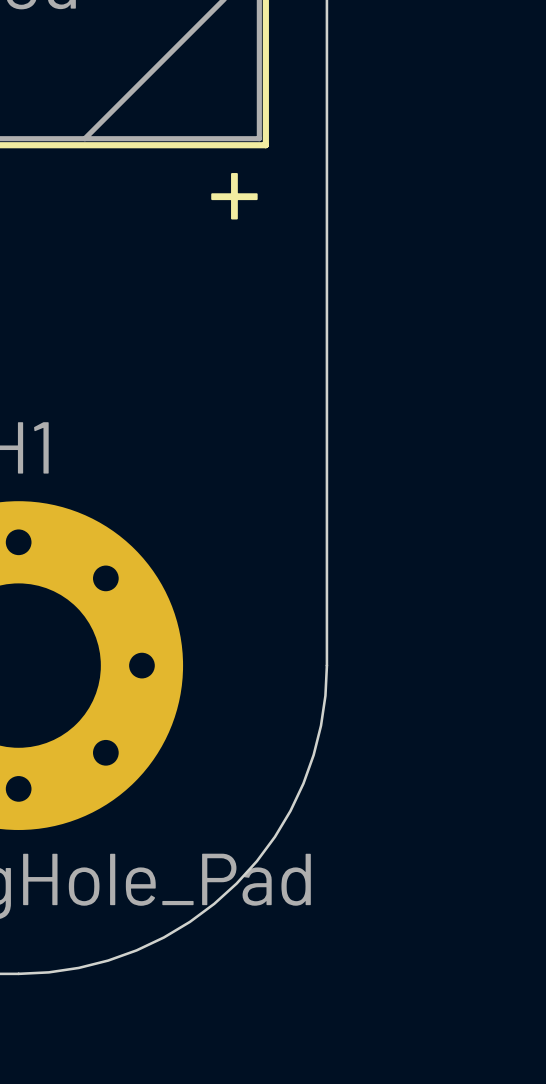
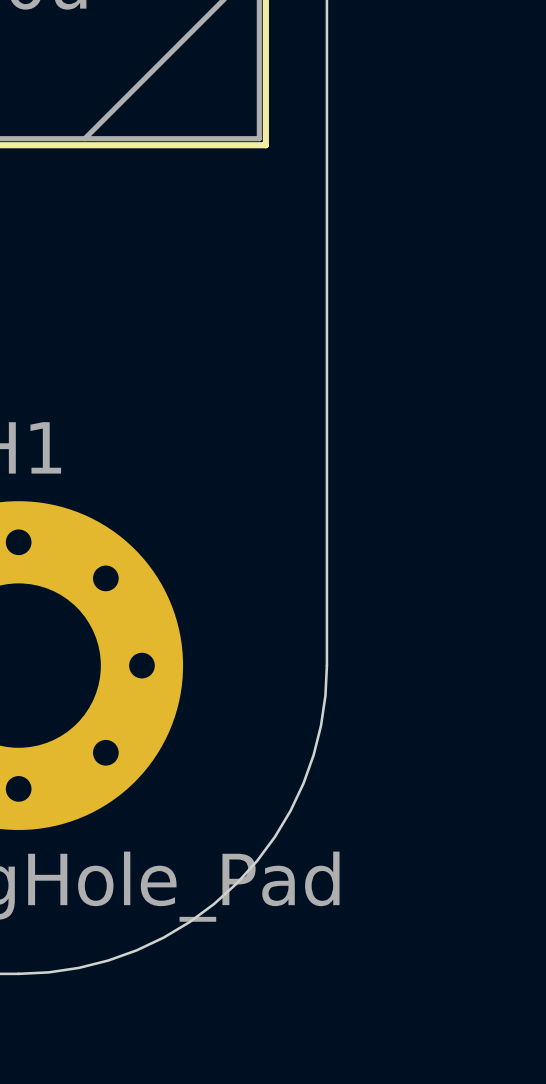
text: + (234, 196) -> none

